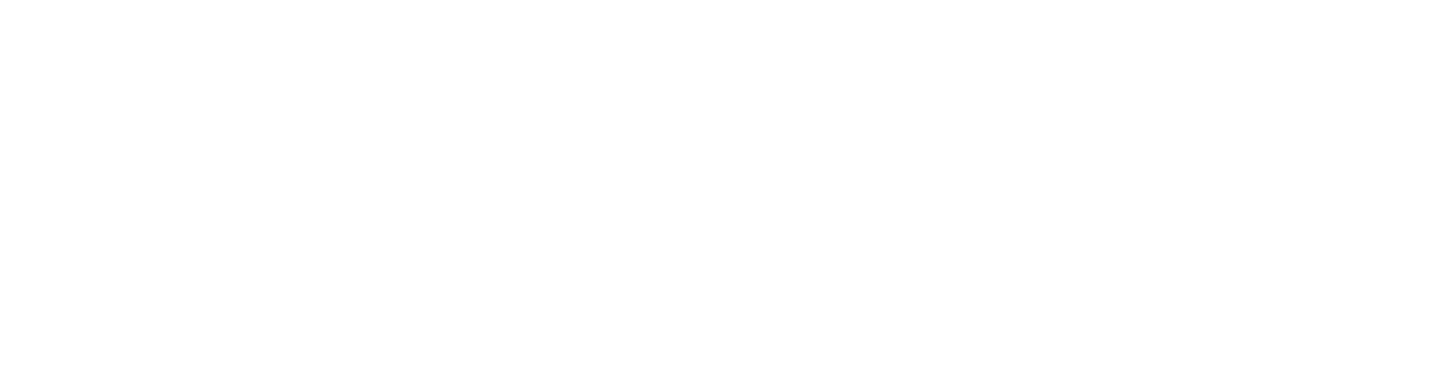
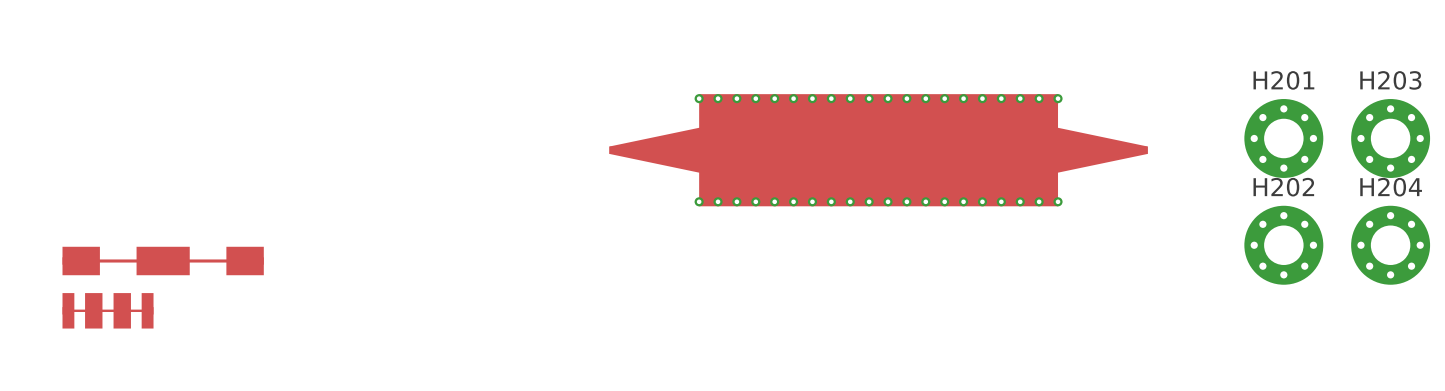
H201: none -> (1283, 138)
H203: none -> (1390, 138)
part: none -> (878, 150)
H202: none -> (1283, 245)
H204: none -> (1390, 245)
part: none -> (163, 261)
part: none -> (108, 310)

